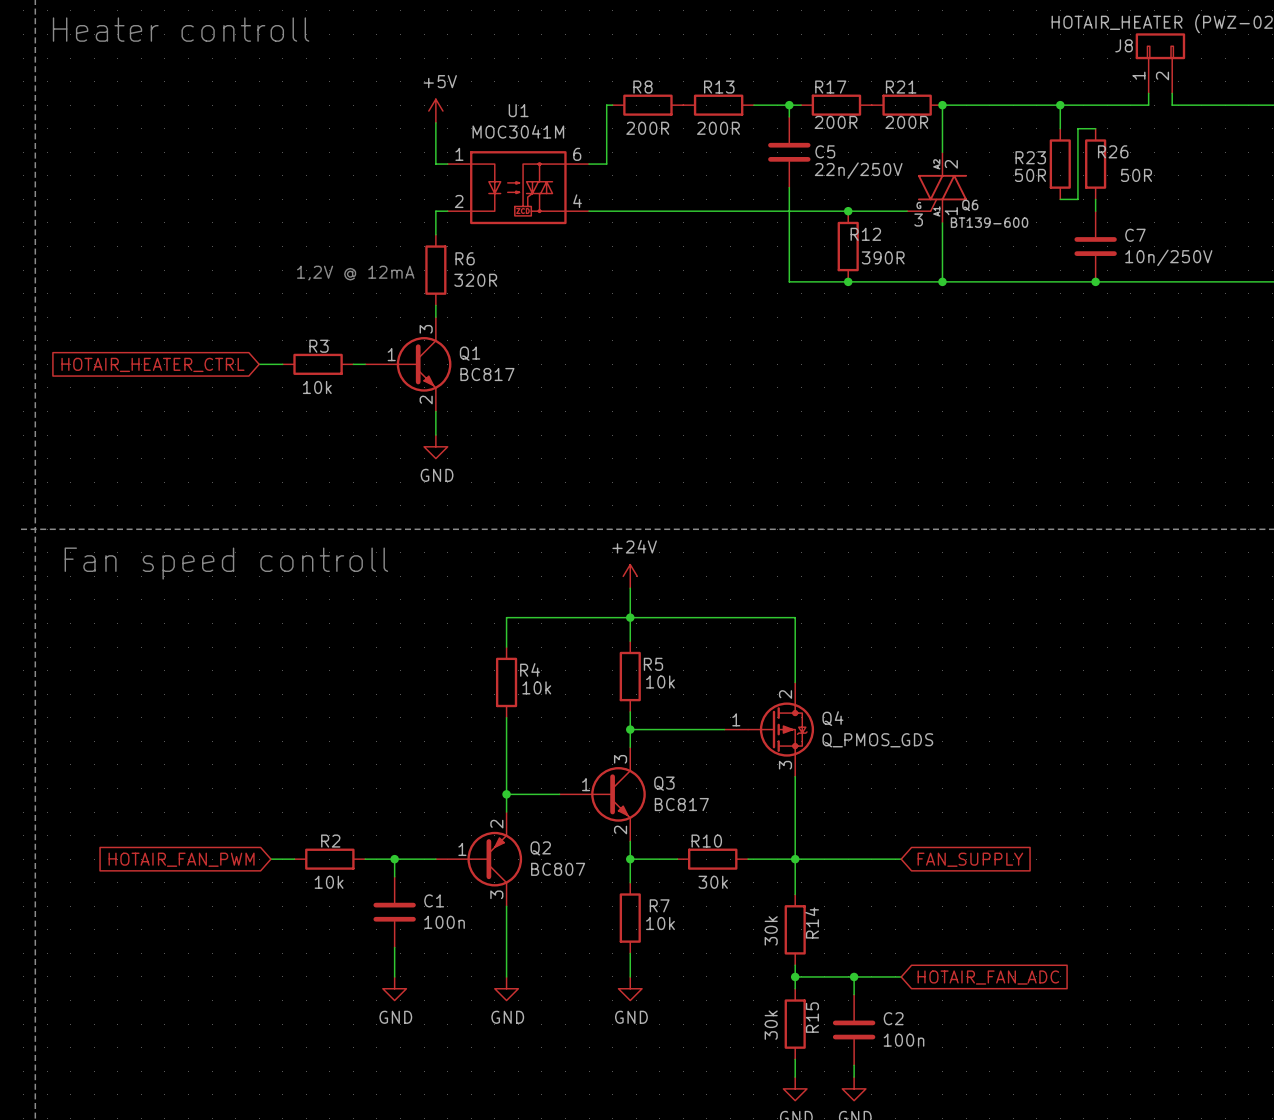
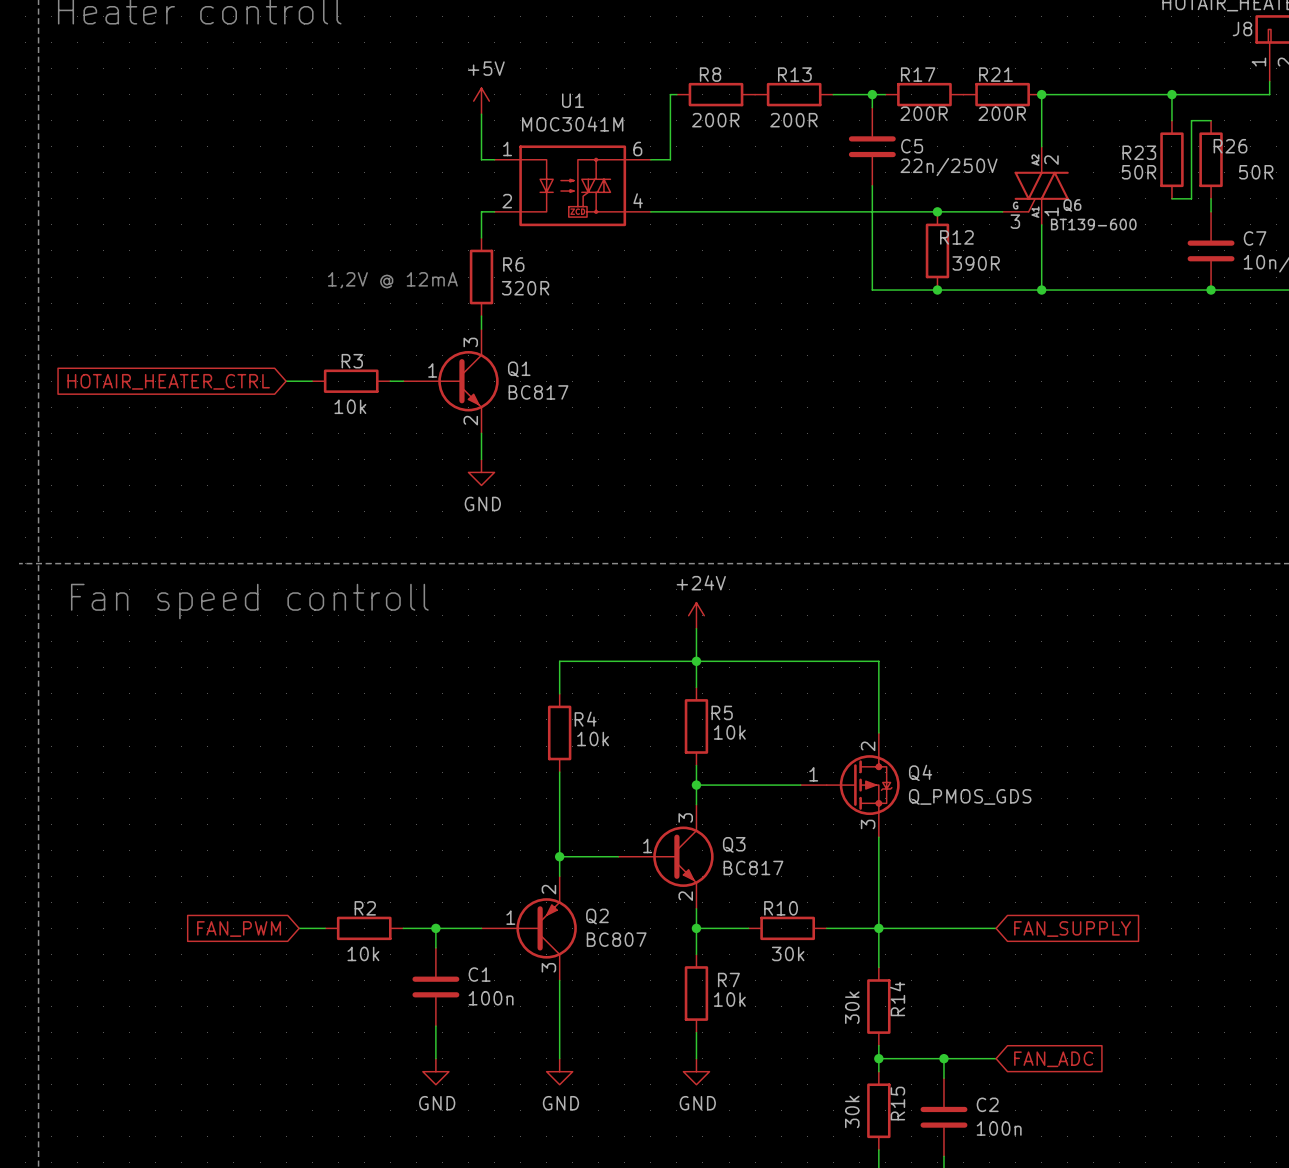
global label: HOTAIR_FAN_PWM (181, 859) -> FAN_PWM (239, 929)
global label: HOTAIR_FAN_ADC (988, 977) -> FAN_ADC (1053, 1059)

